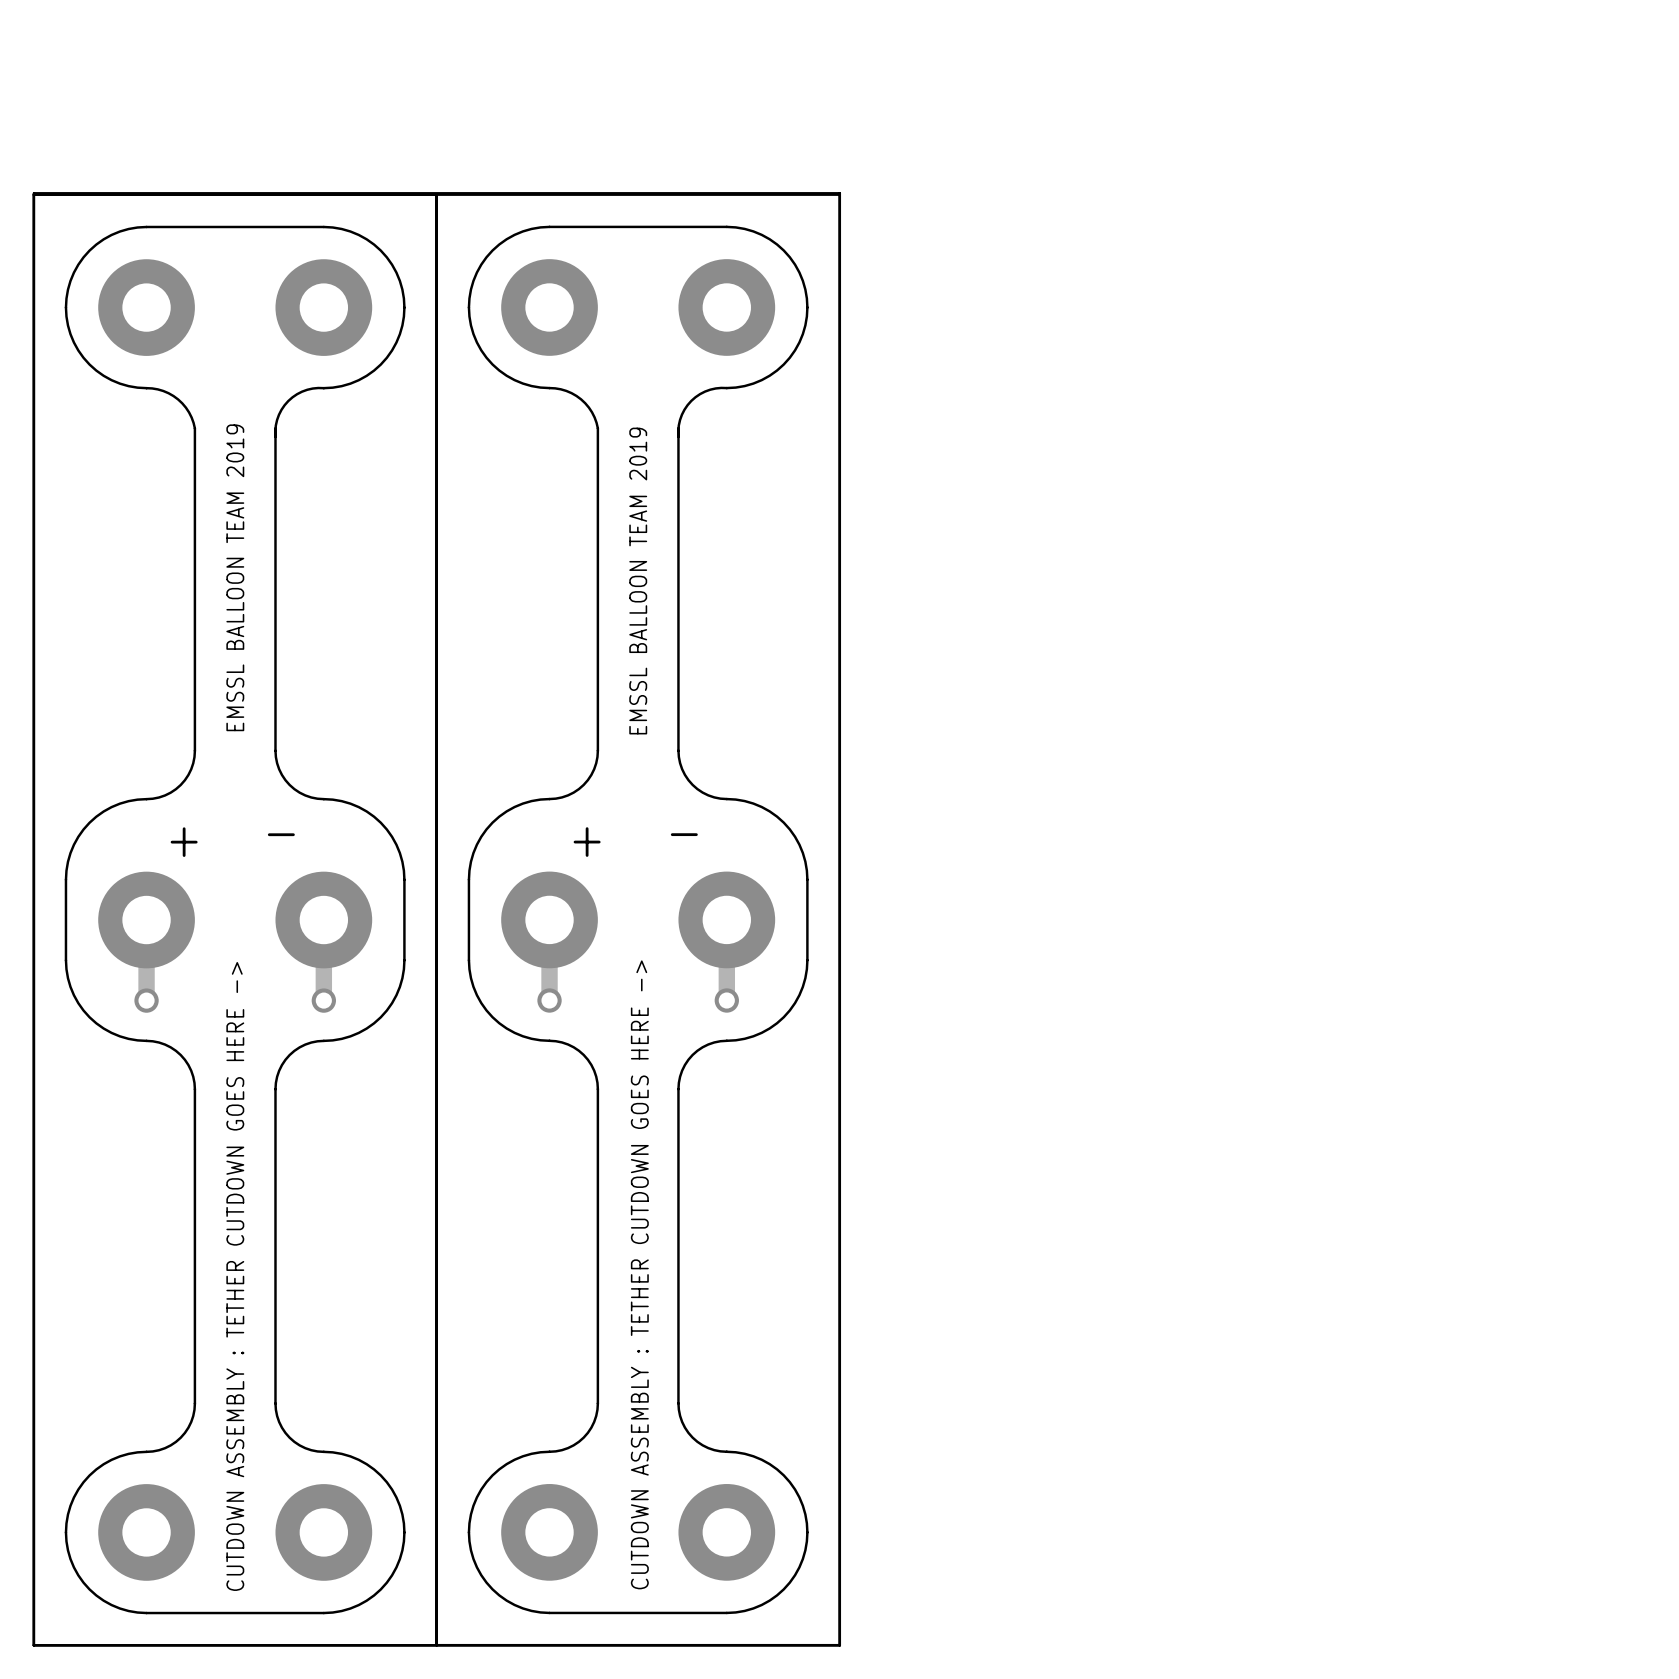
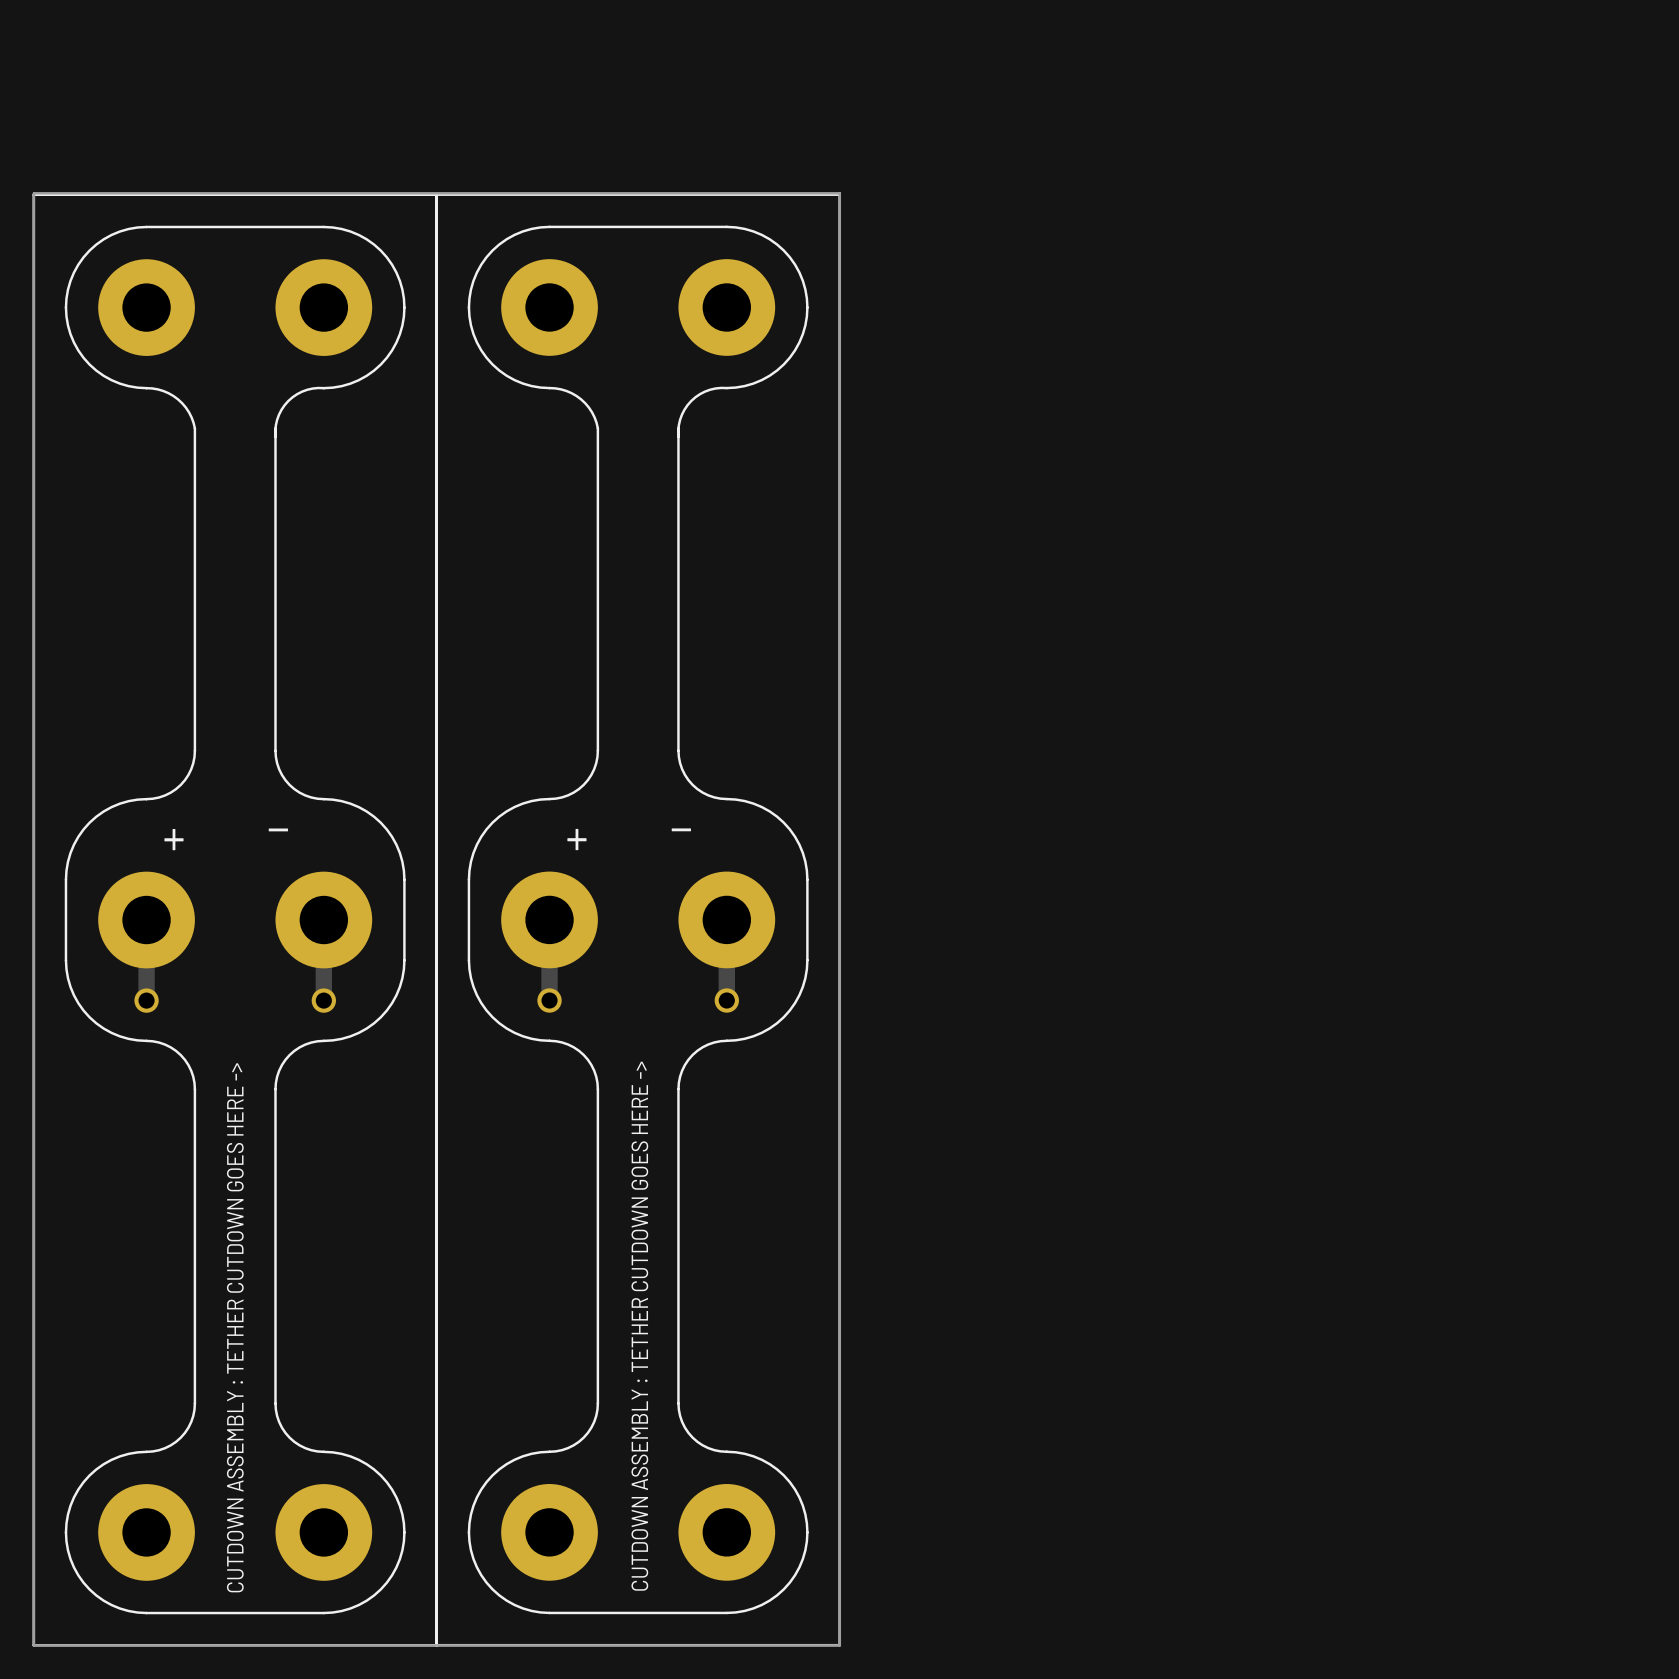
text: EMSSL BALLOON TEAM 2019 (235, 577) -> none
text: EMSSL BALLOON TEAM 2019 (638, 581) -> none

